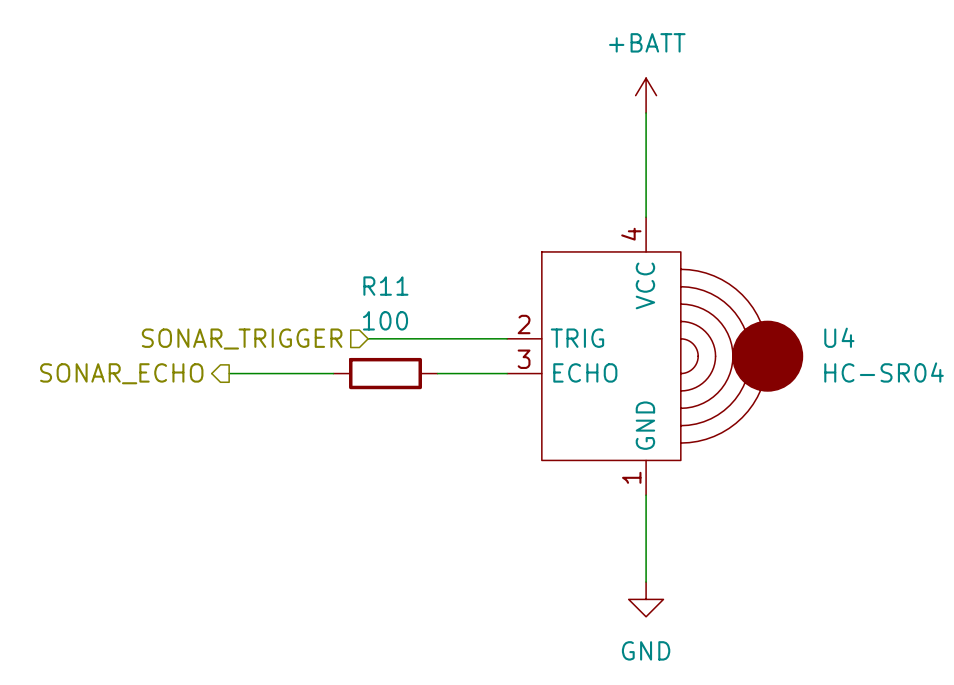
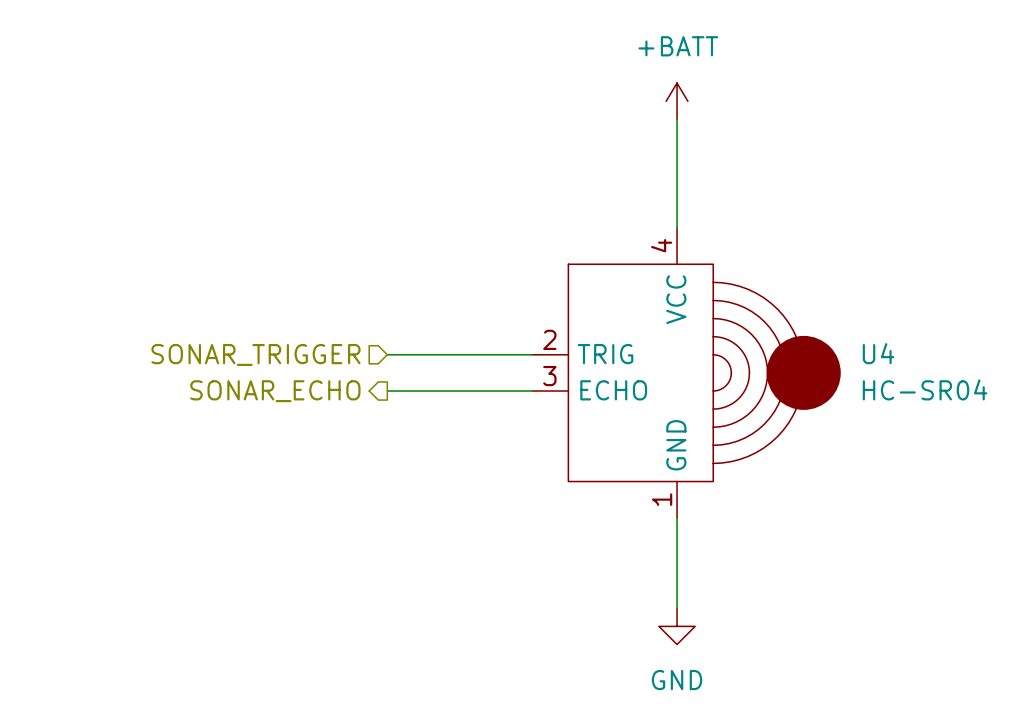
hierarchical label position: SONAR_ECHO (121, 373) -> SONAR_ECHO (275, 391)
wire: (229, 373) (333, 373) -> none
wire: none -> (387, 391) (459, 391)
R11: 100 (385, 373) -> none

